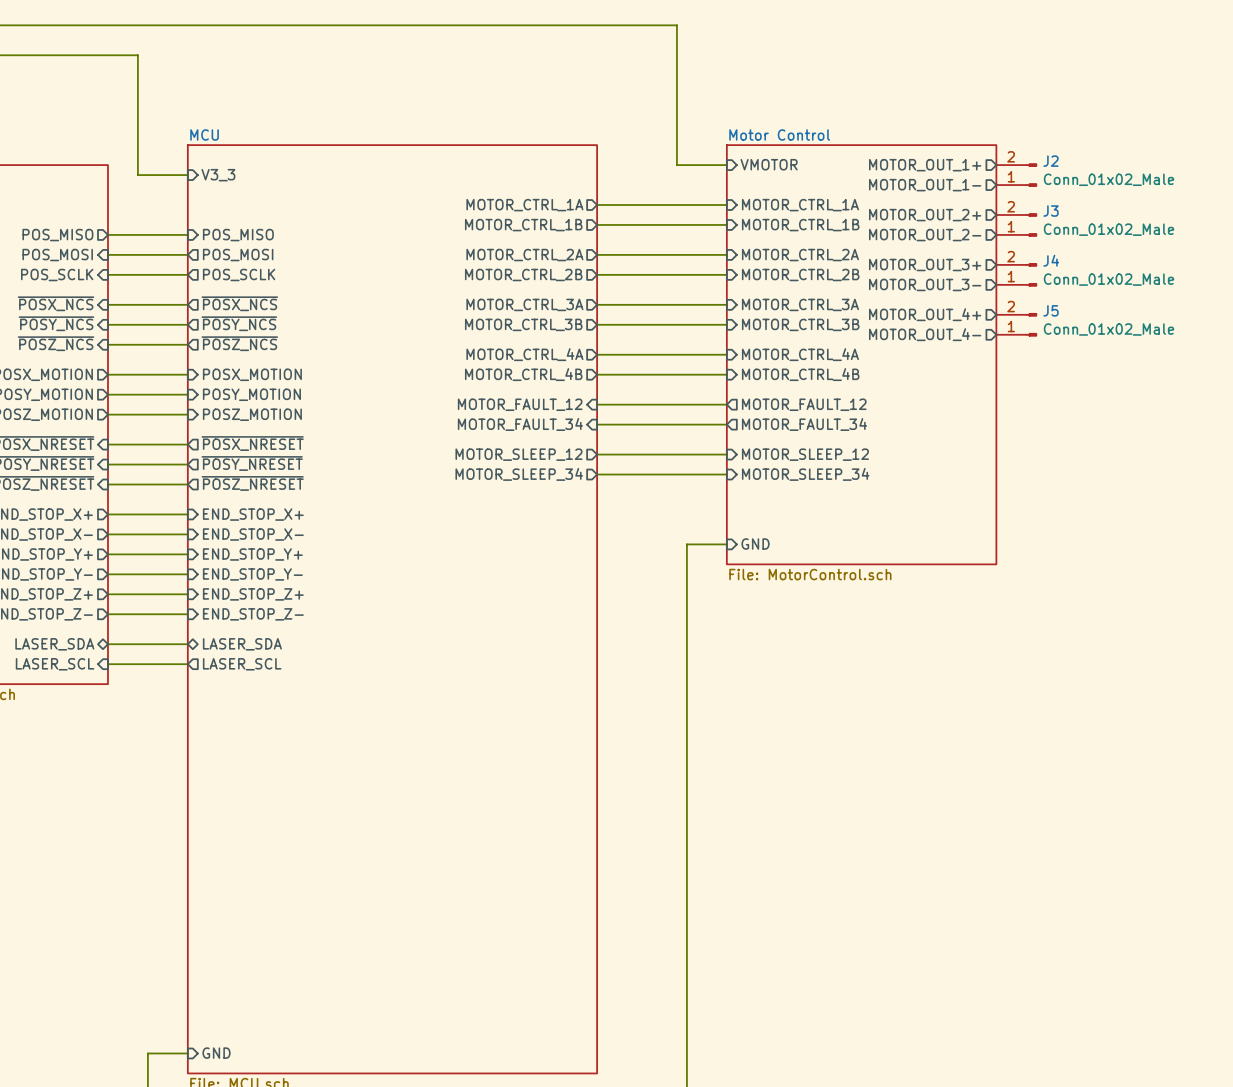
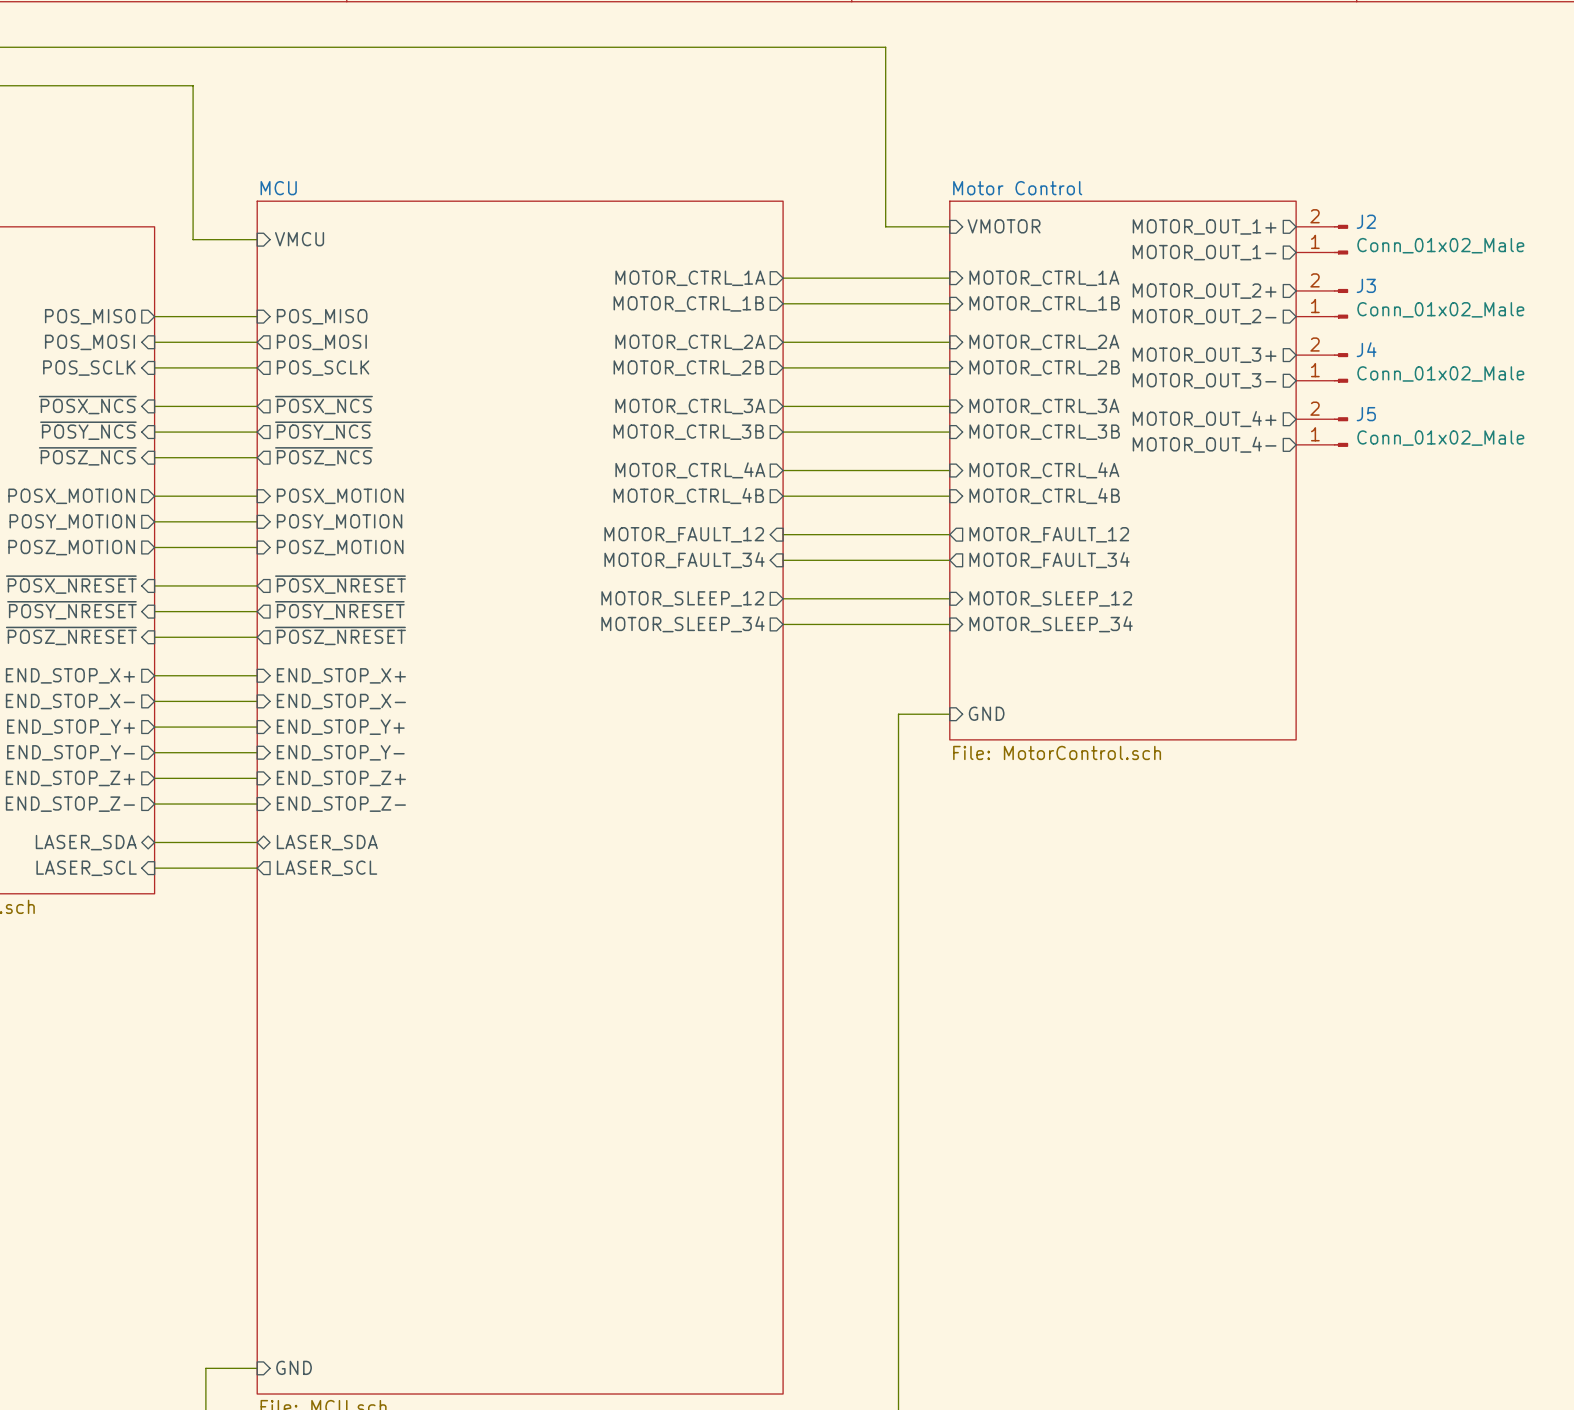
sheet pin: V3_3 (218, 175) -> VMCU (299, 239)

